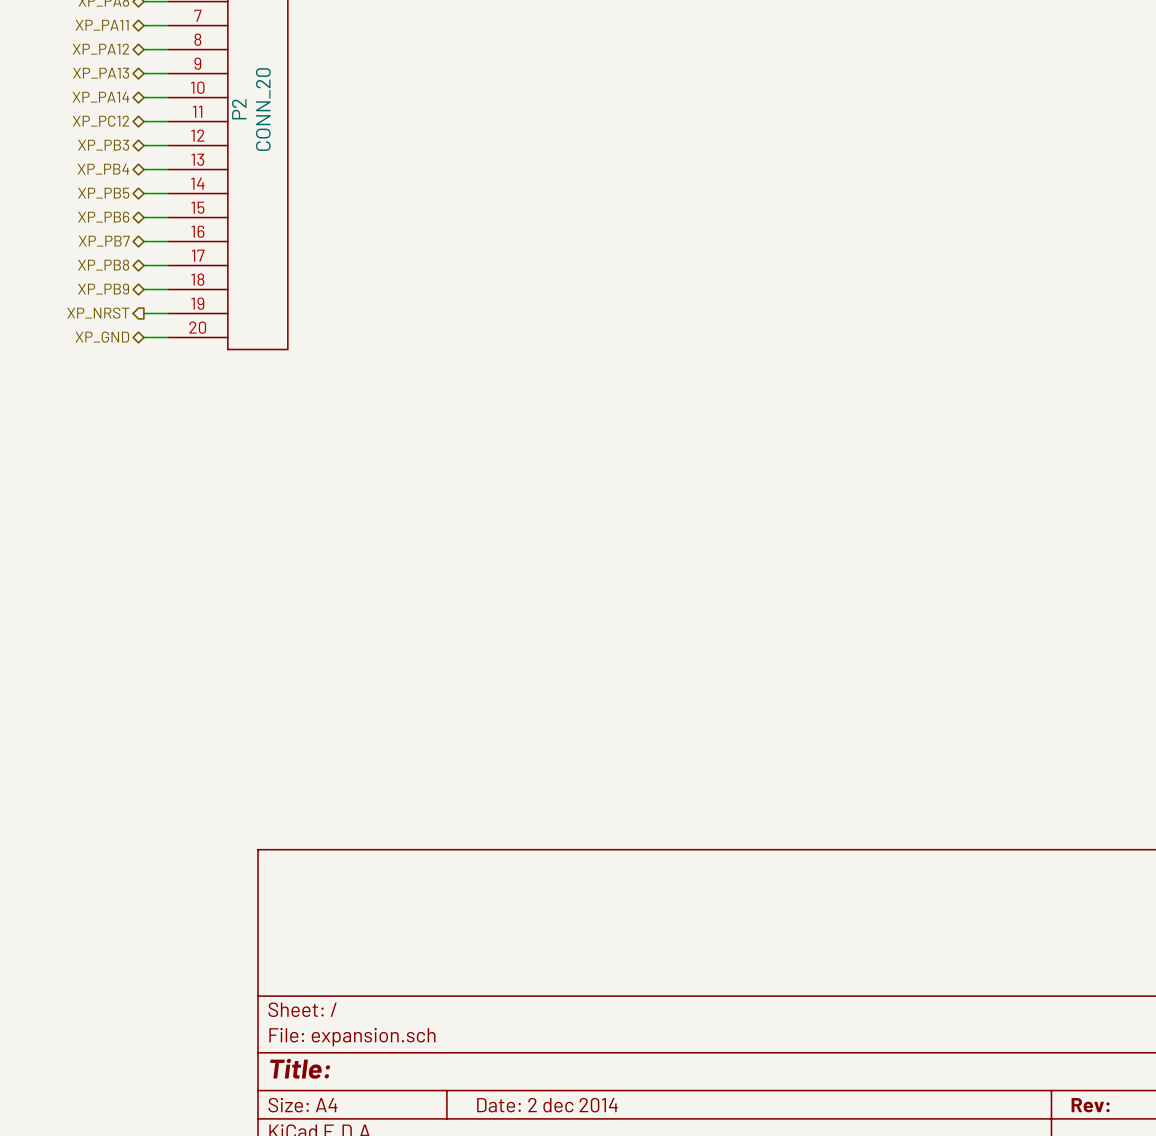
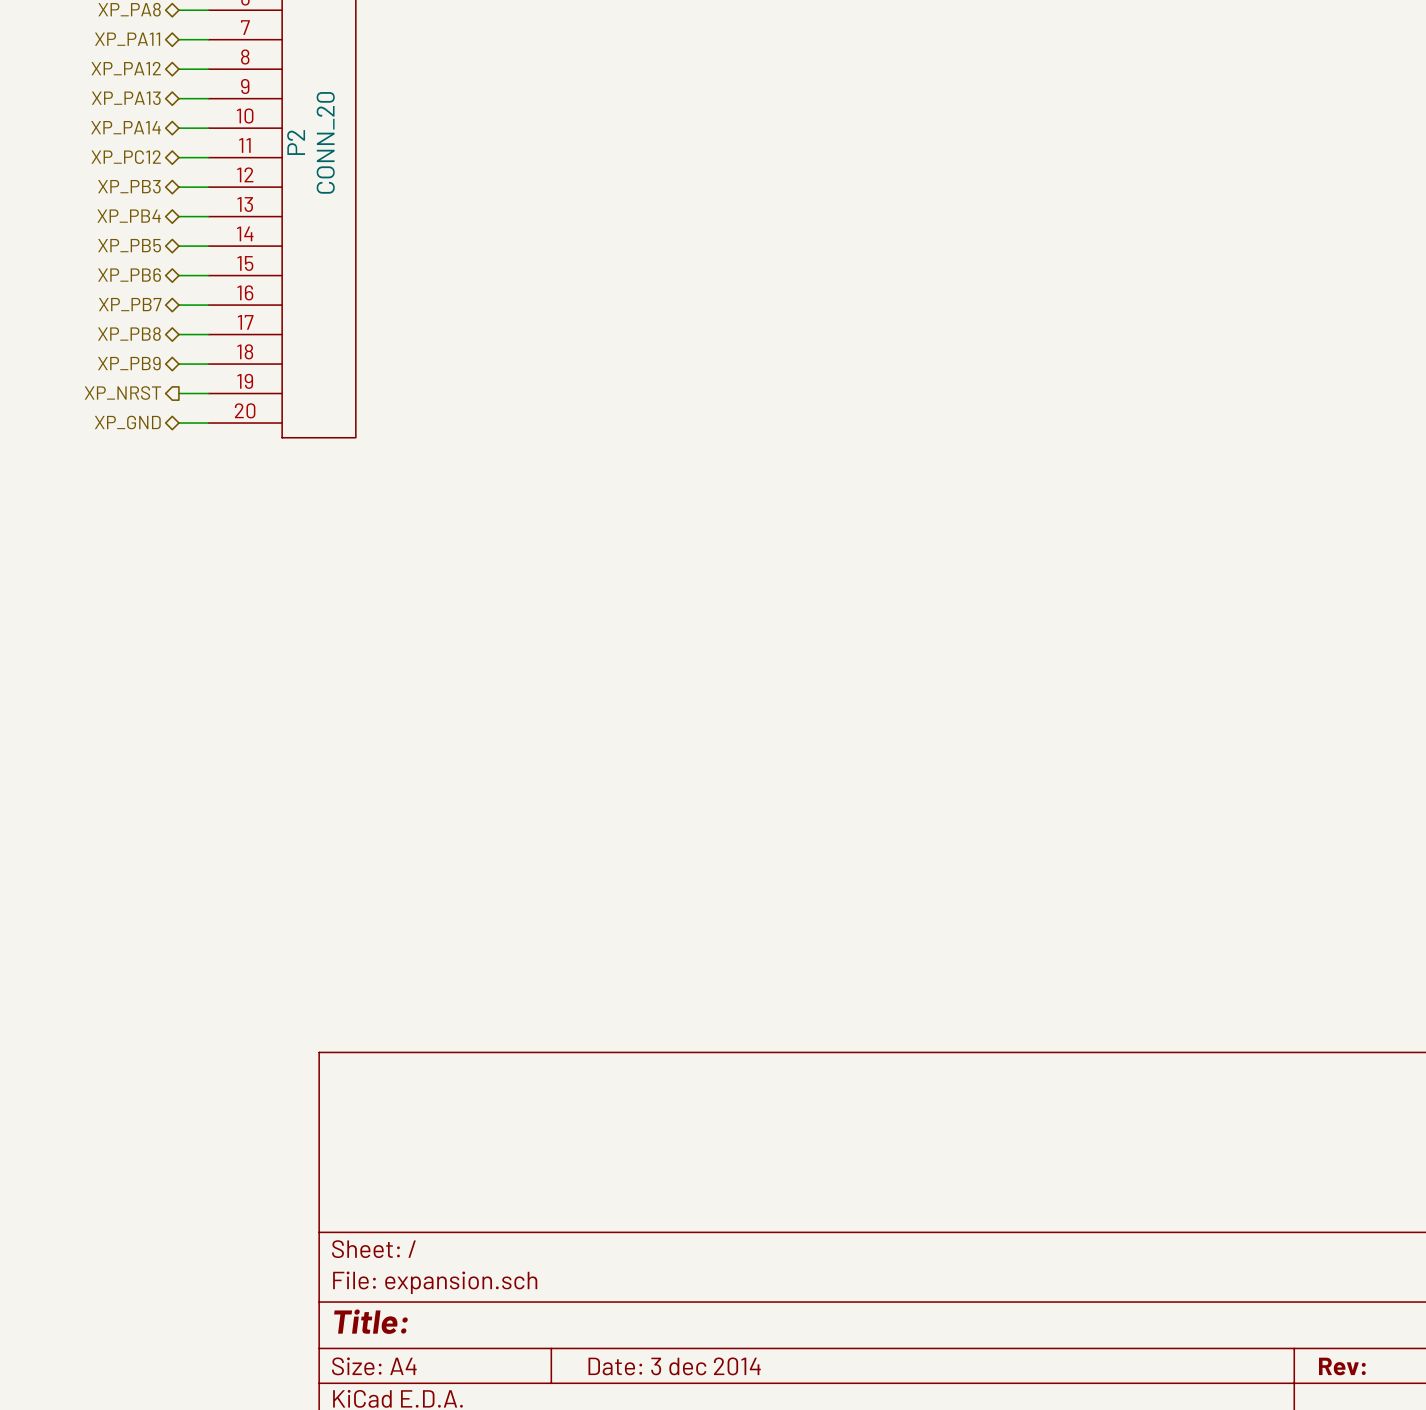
title block: Date: 2 dec 2014 (547, 1105) -> Date: 3 dec 2014 (674, 1366)

